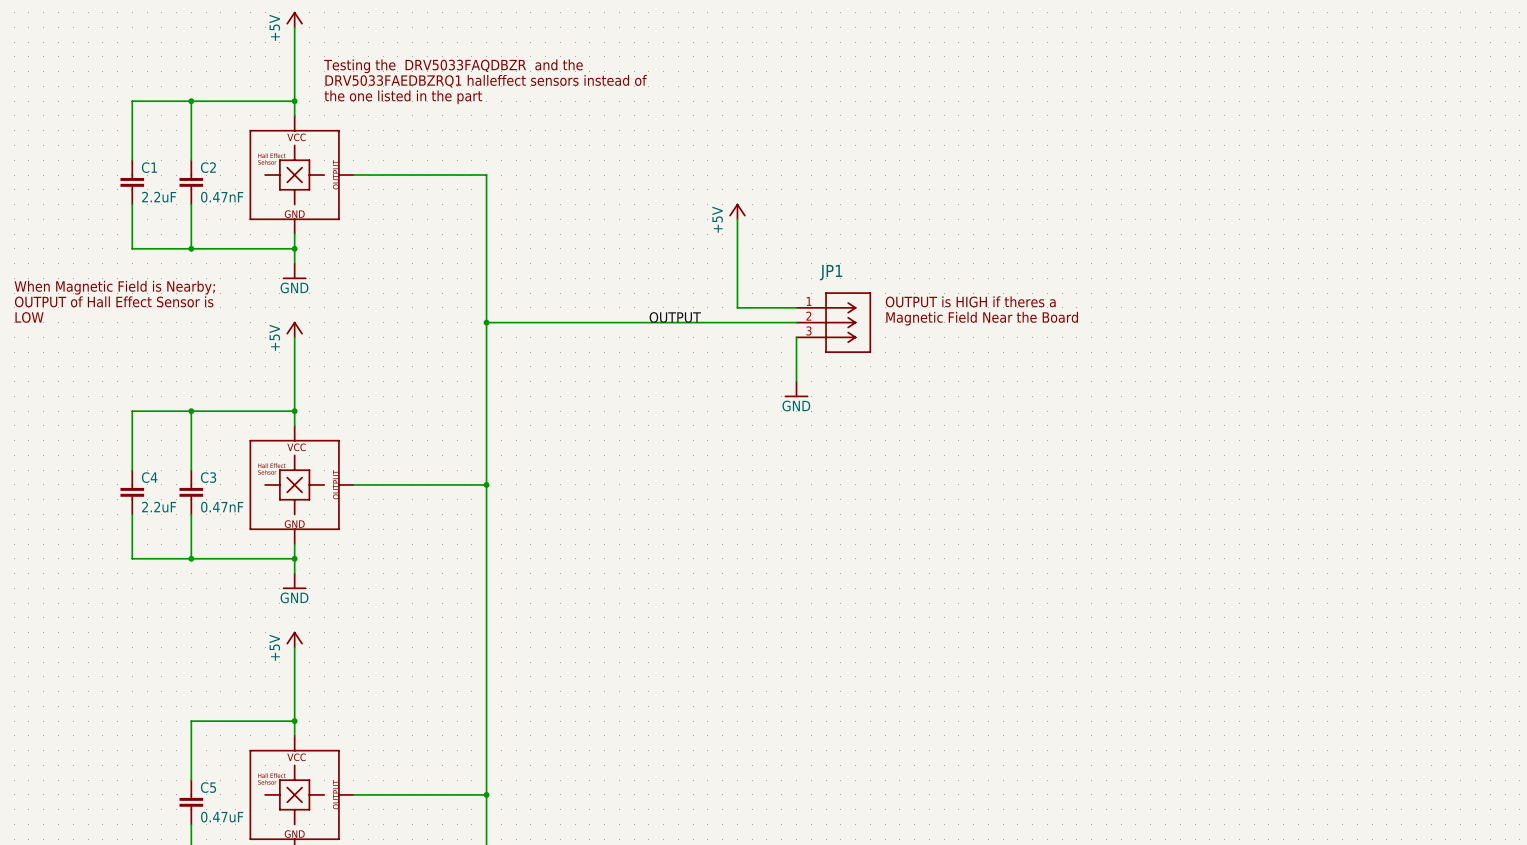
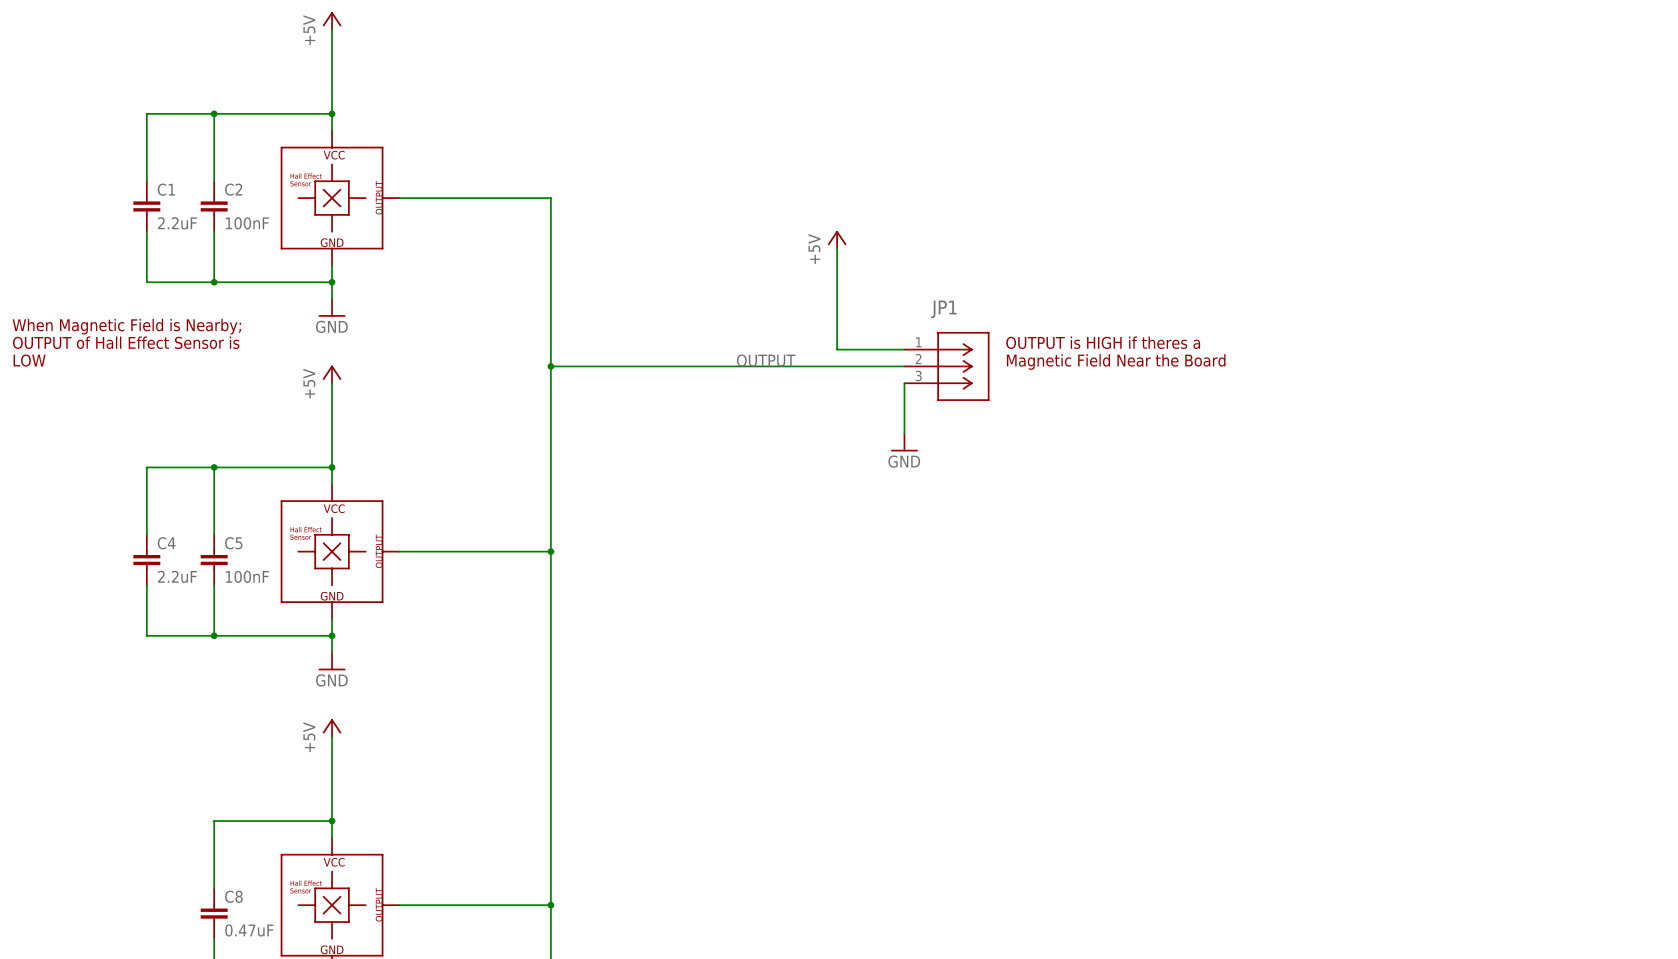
text: Testing the DRV5033FAQDBZR and the (453, 66) -> none
text: DRV5033FAEDBZRQ1 halleffect sensors instead of (486, 81) -> none
text: the one listed in the part (403, 97) -> none
C2 value: 0.47nF (222, 197) -> 100nF (247, 223)
C3 name: C3 (208, 477) -> C5 (233, 543)
C3 value: 0.47nF (222, 507) -> 100nF (247, 576)
C5 name: C5 (208, 787) -> C8 (233, 896)

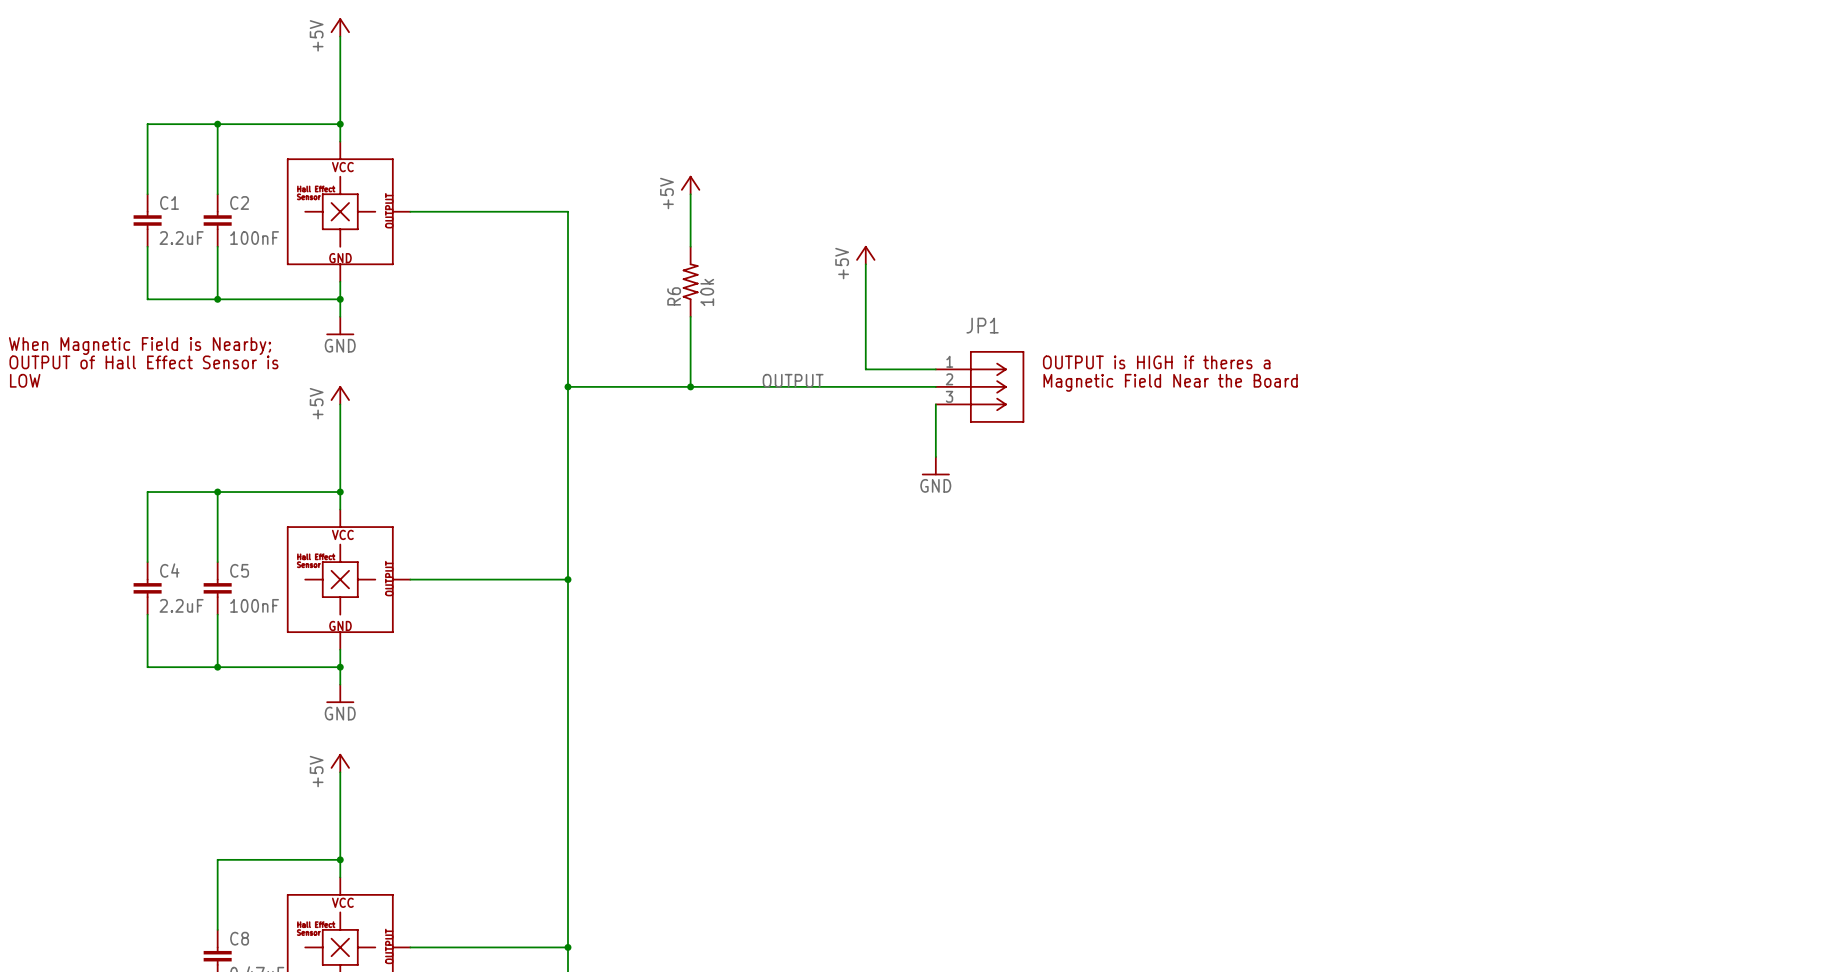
power symbol: none -> +5V (690, 185)
wire: none -> (690, 194) (690, 246)
R6: none -> 10k (690, 281)
wire: none -> (690, 316) (690, 386)
junction: none -> (690, 386)

